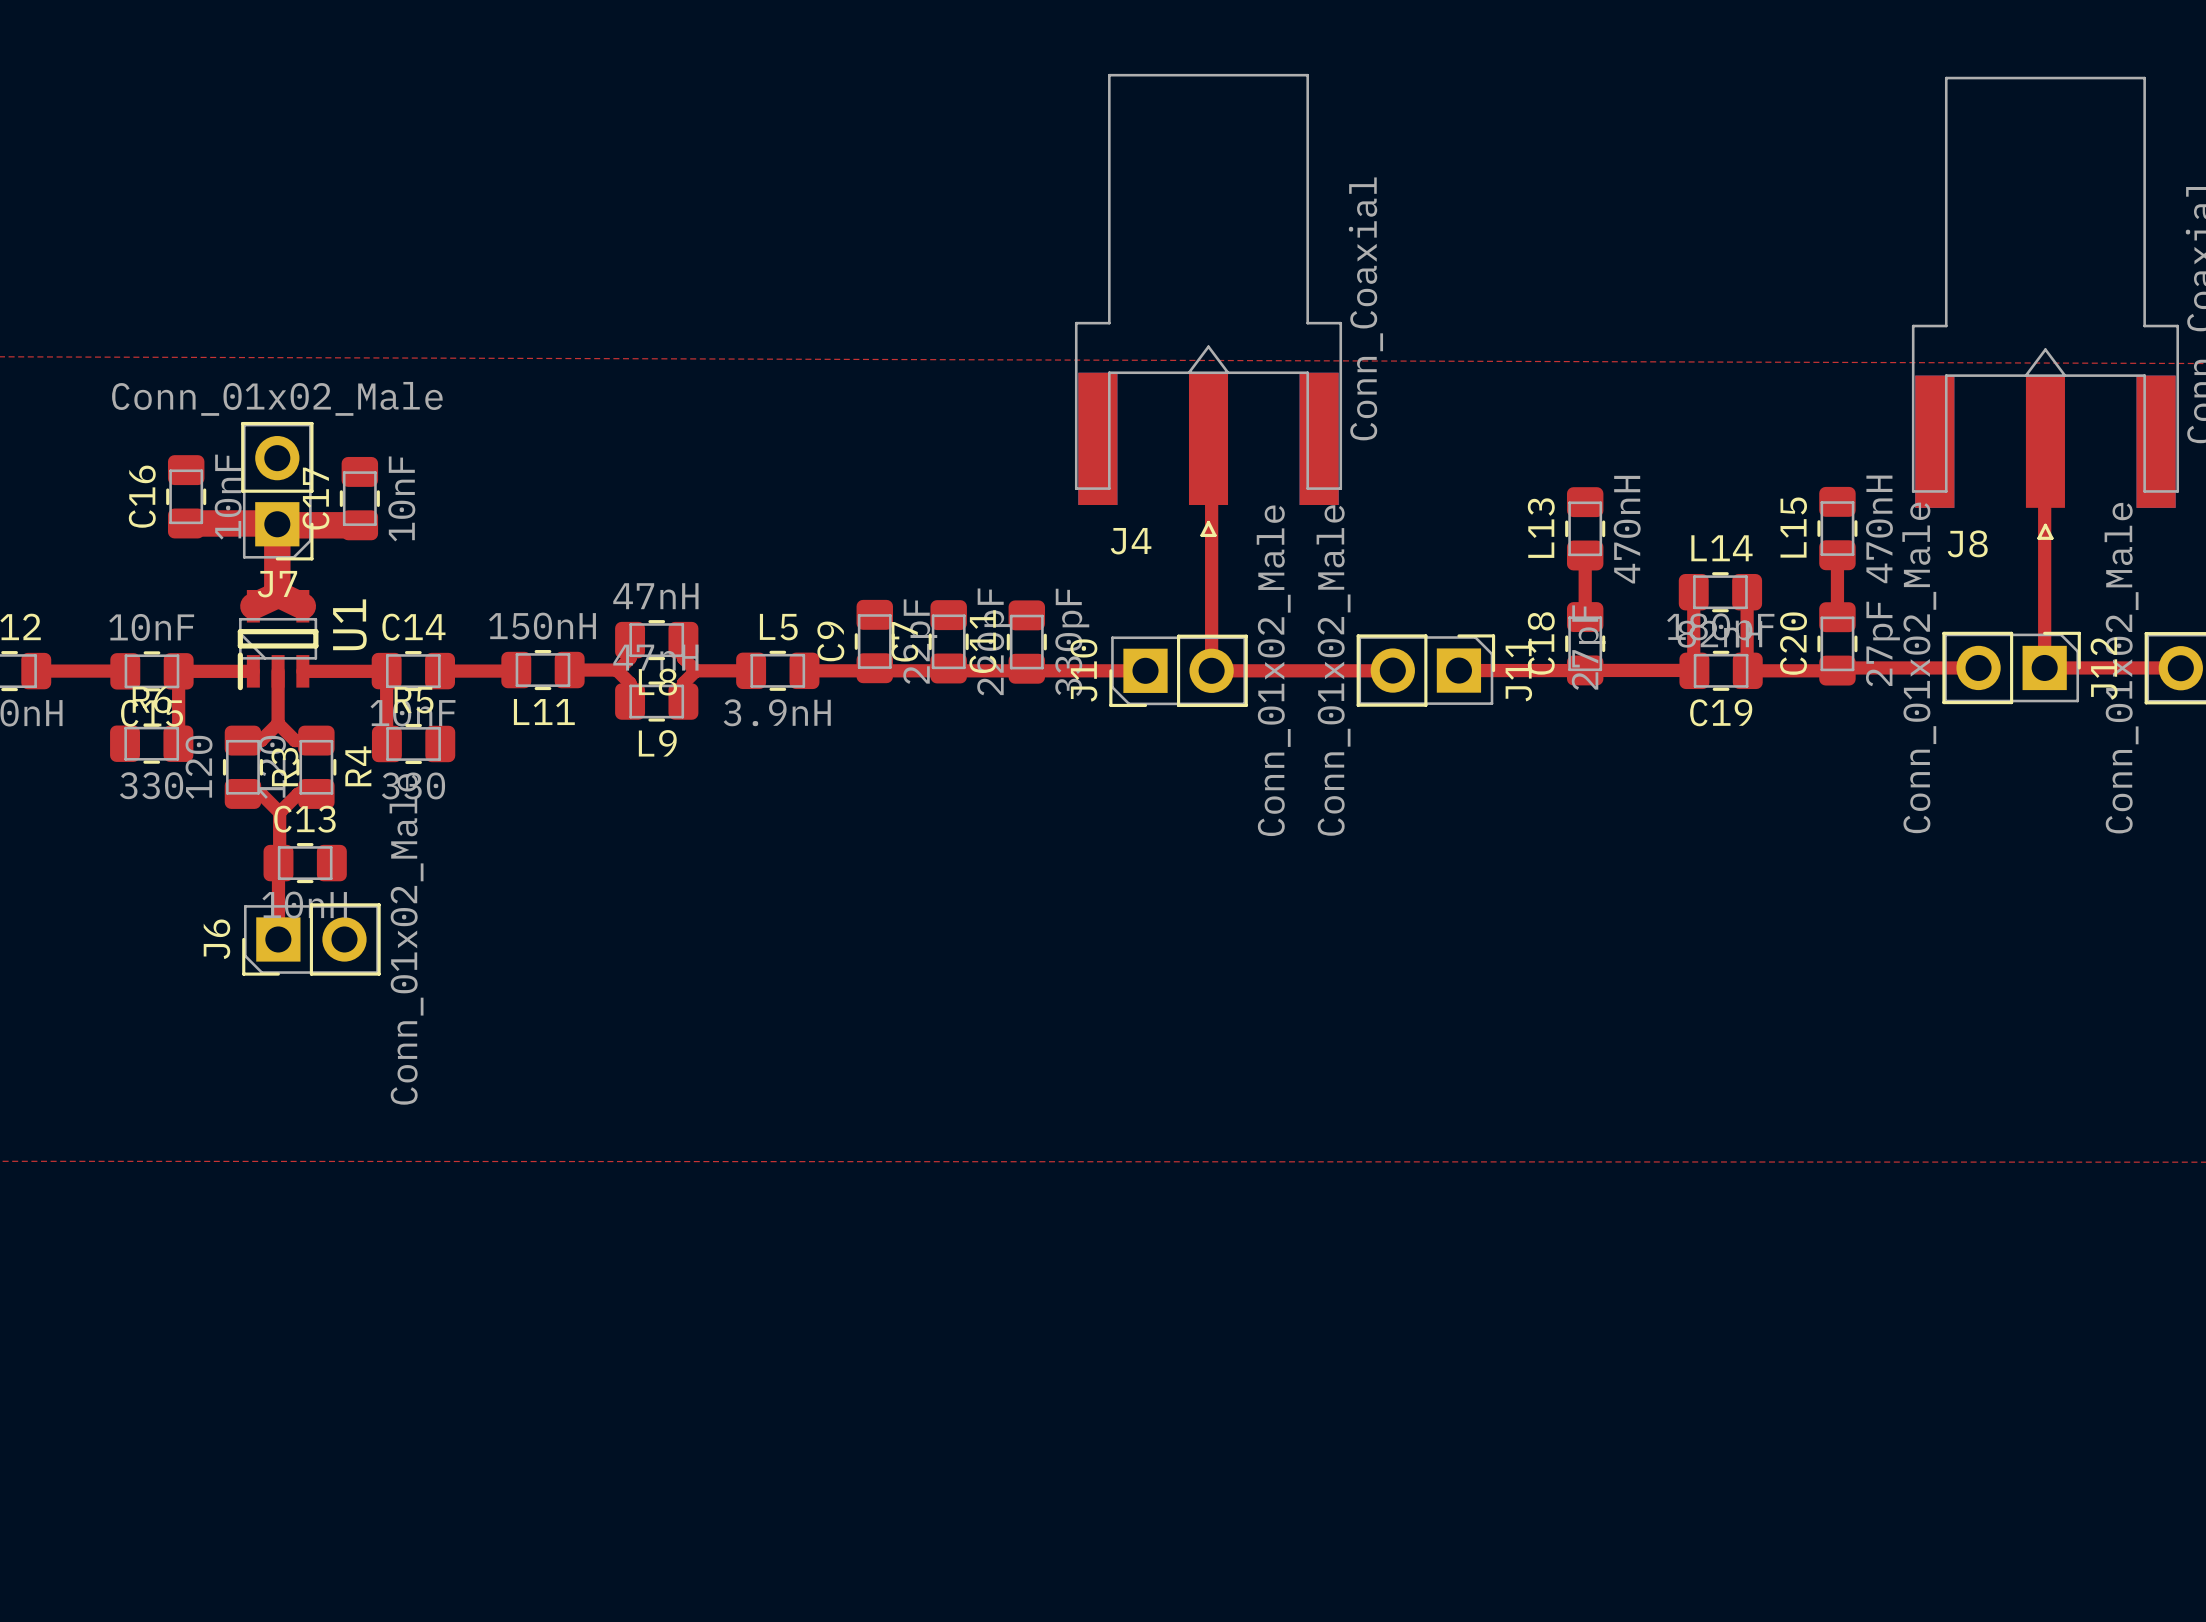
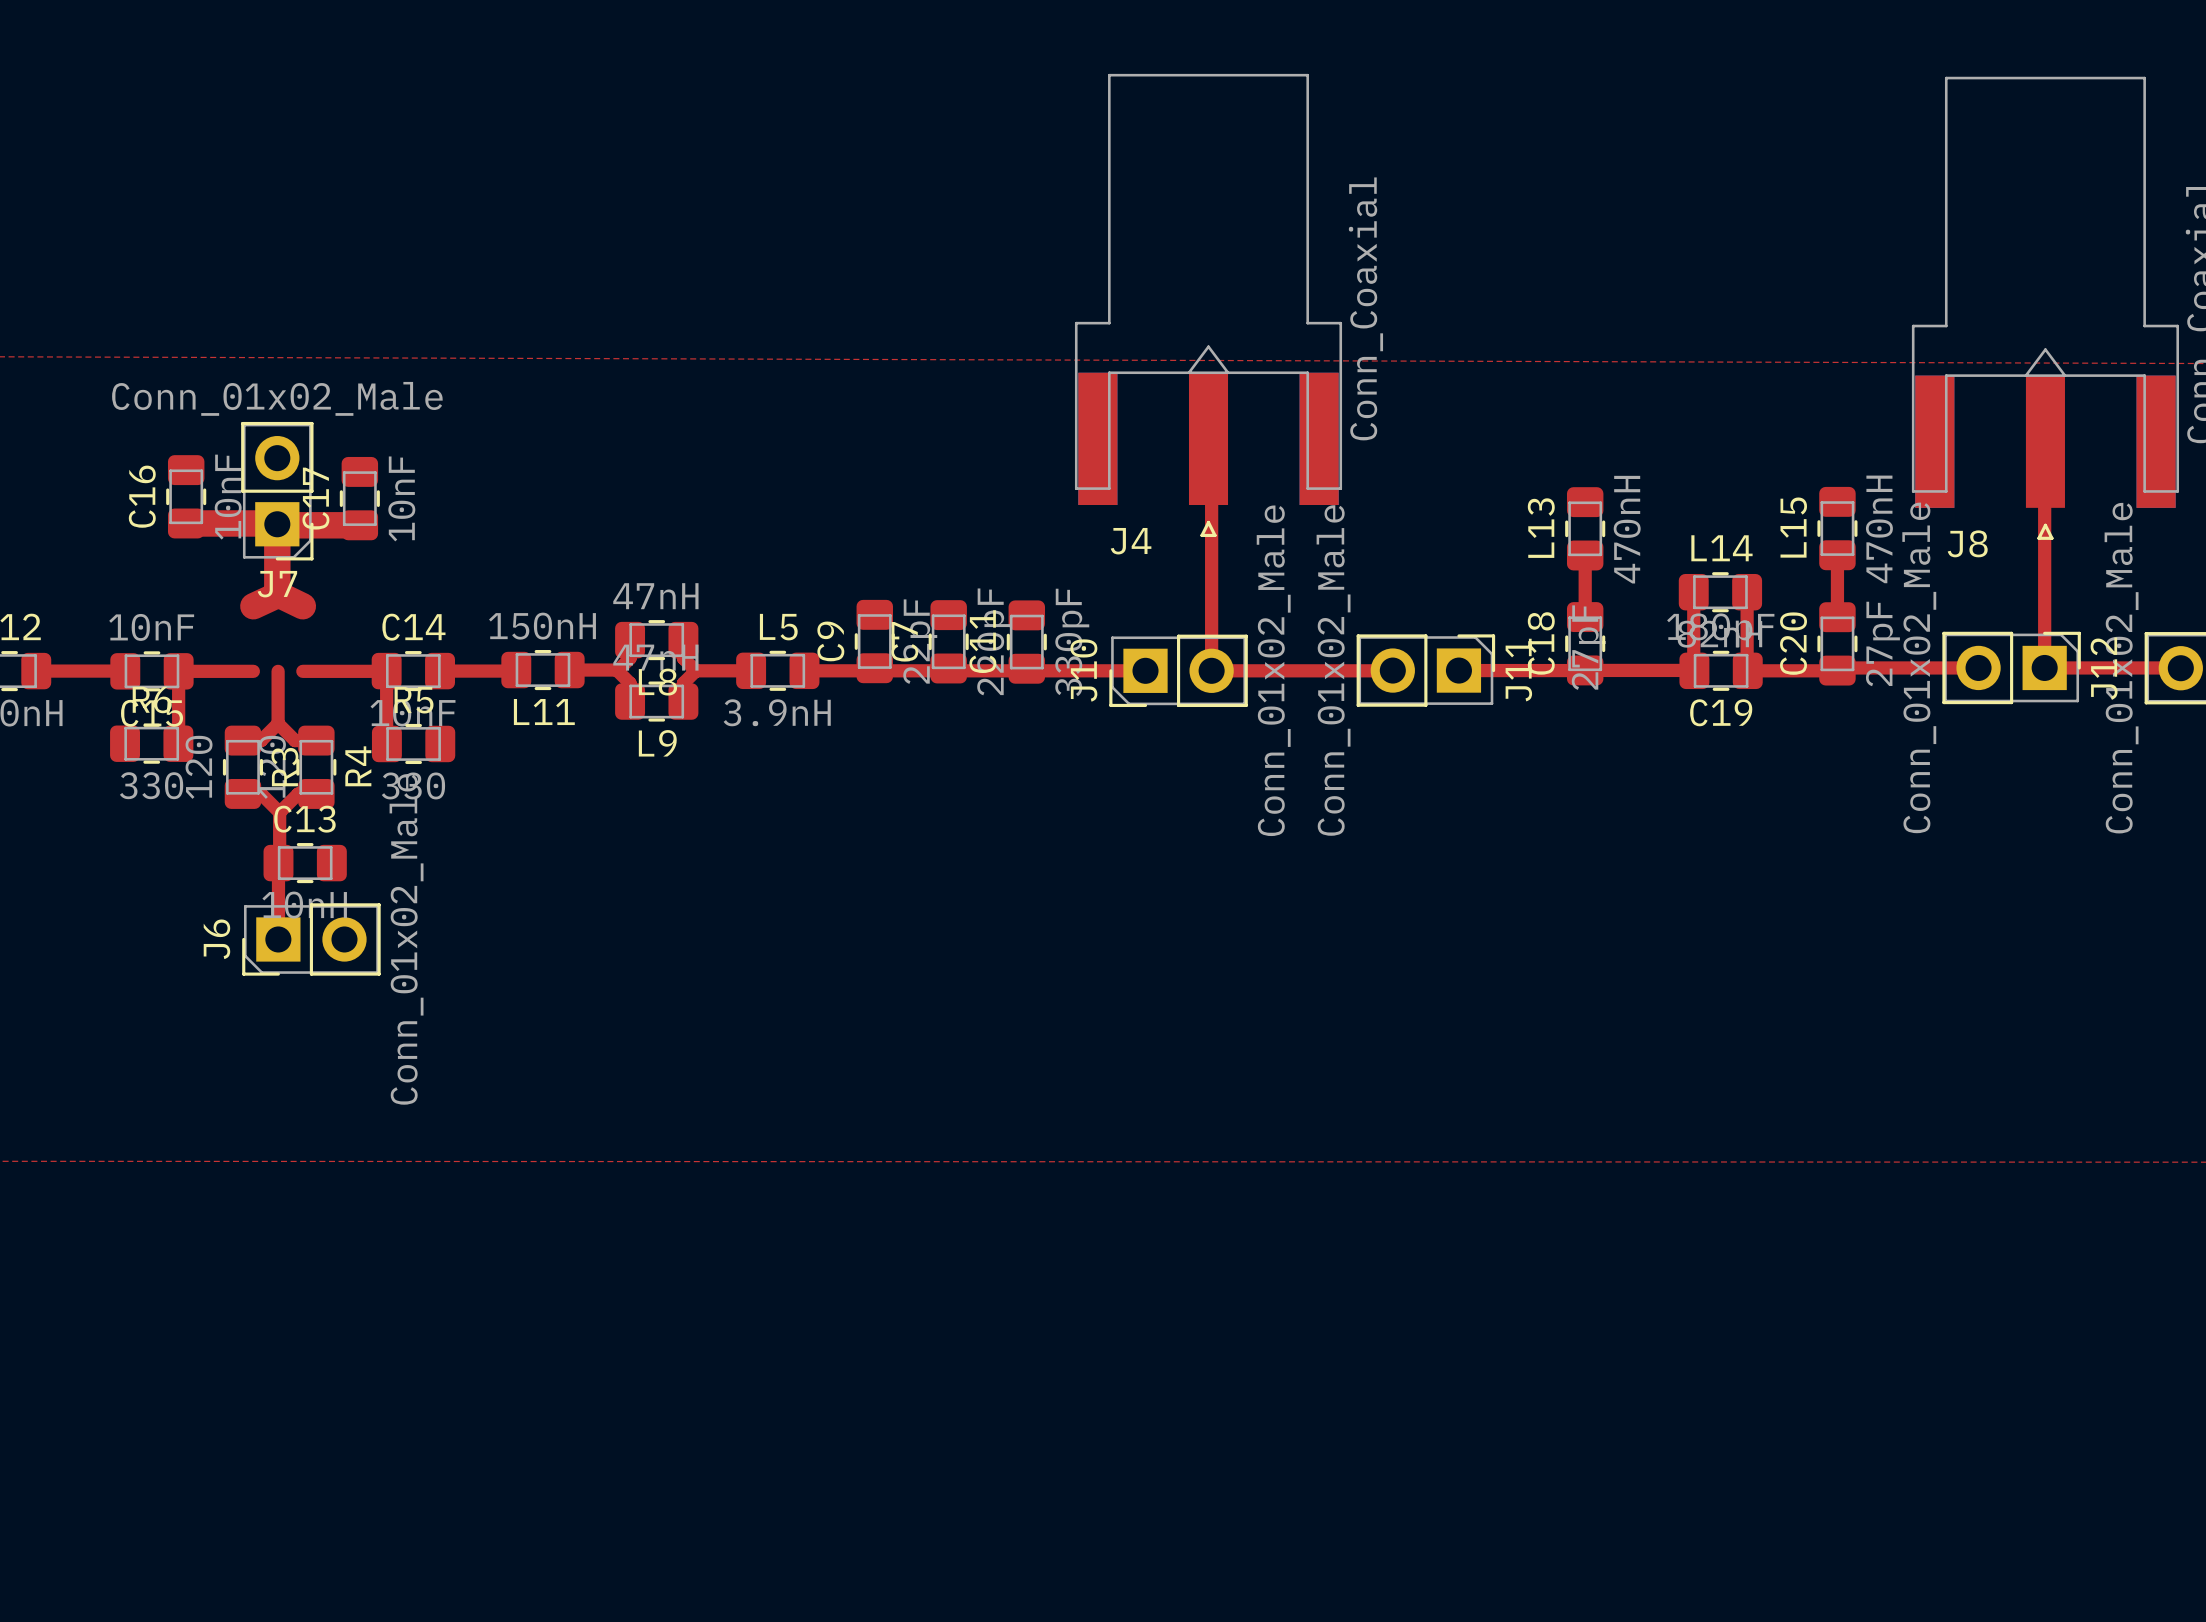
U1: (278, 640) -> none

